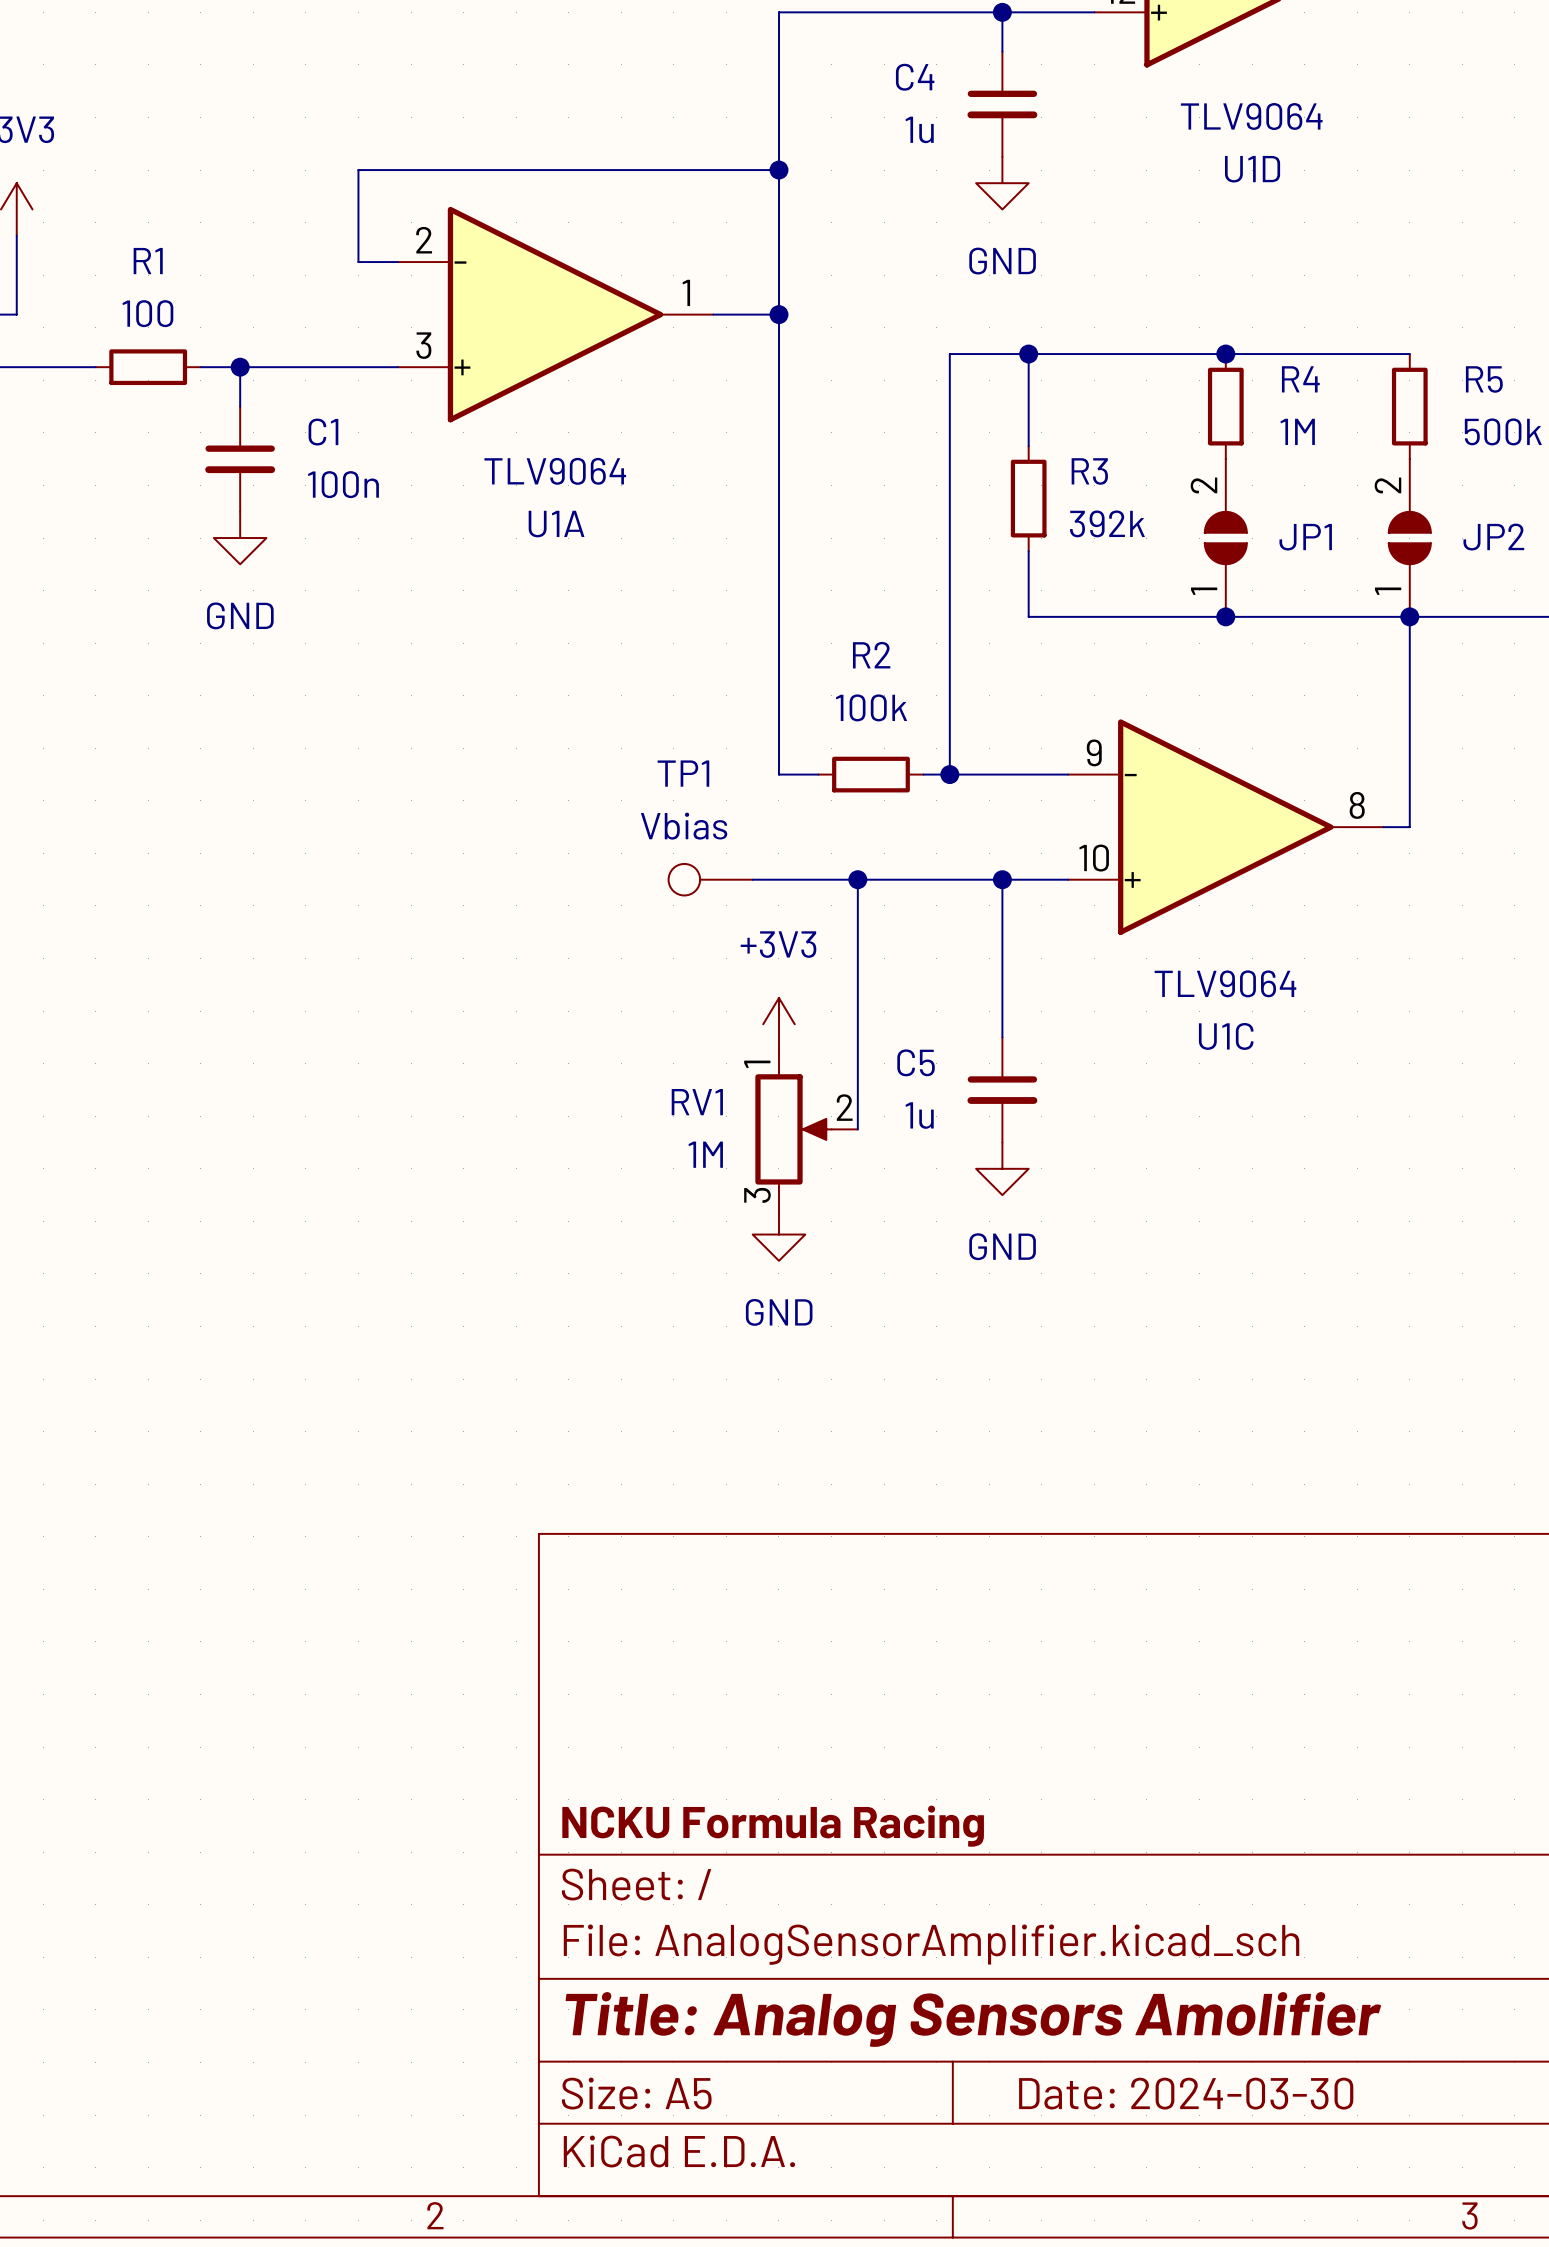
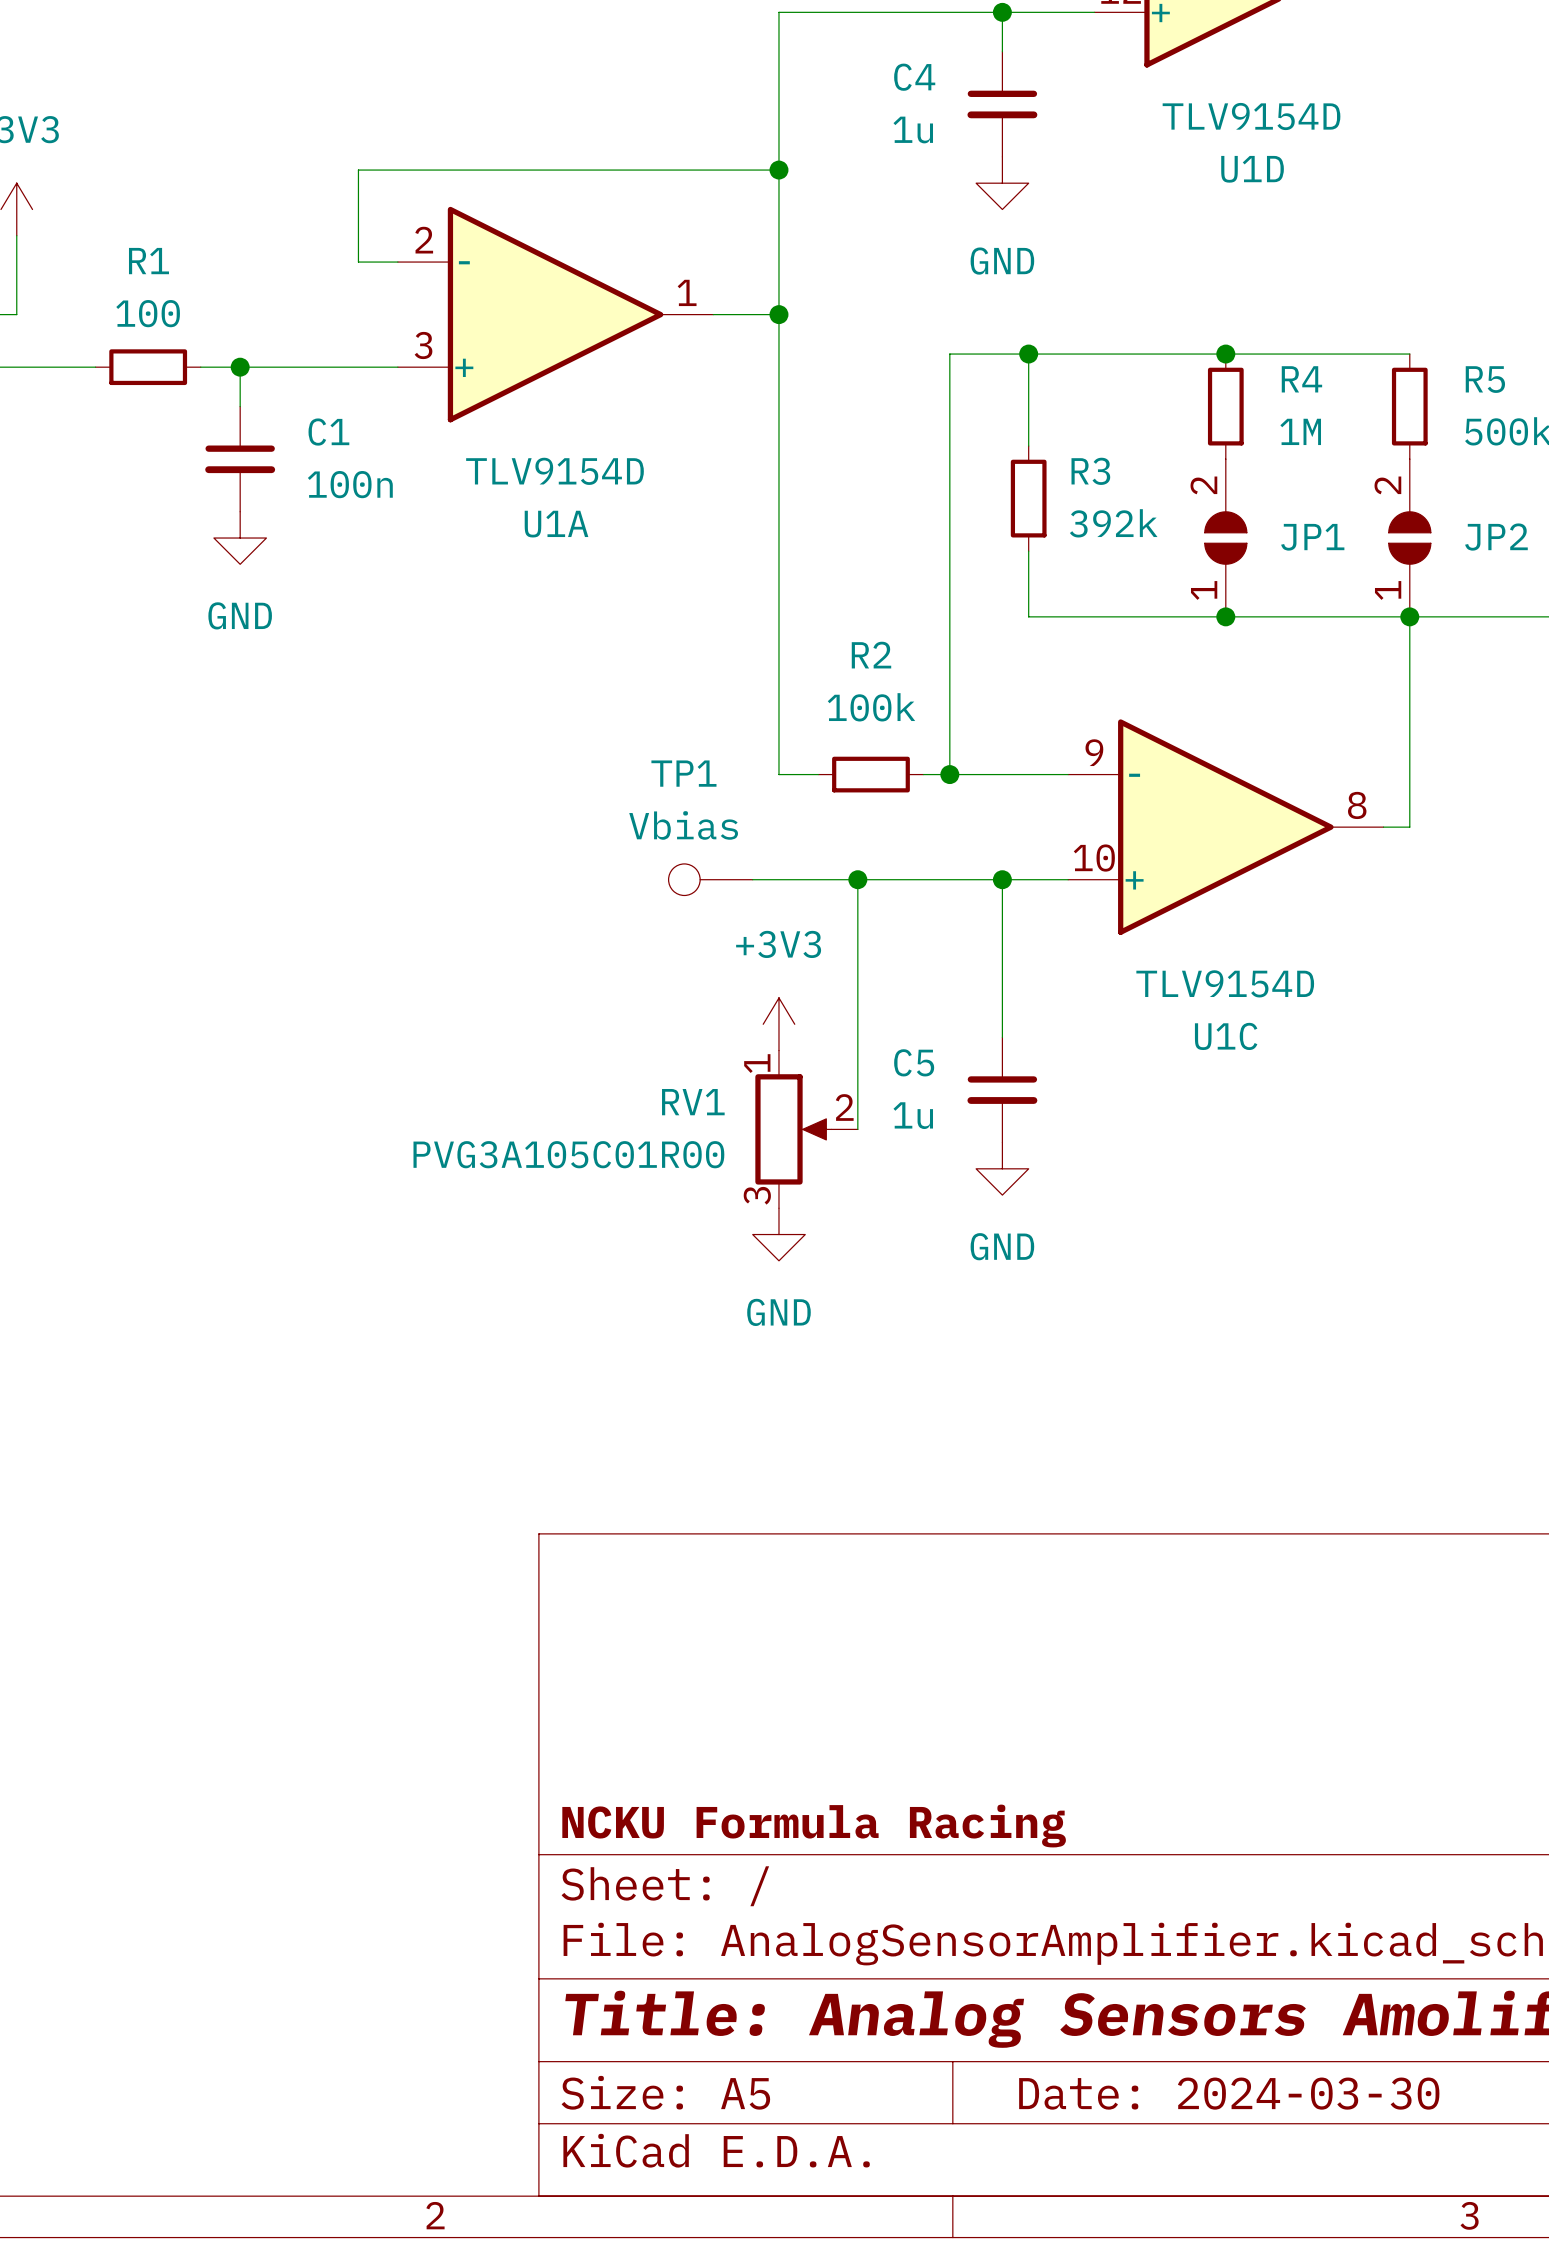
U1D value: TLV9064 (1251, 116) -> TLV9154D (1251, 116)
U1A value: TLV9064 (555, 471) -> TLV9154D (554, 471)
U1C value: TLV9064 (1225, 983) -> TLV9154D (1225, 983)
RV1 value: 1M (705, 1154) -> PVG3A105C01R00 (568, 1154)

